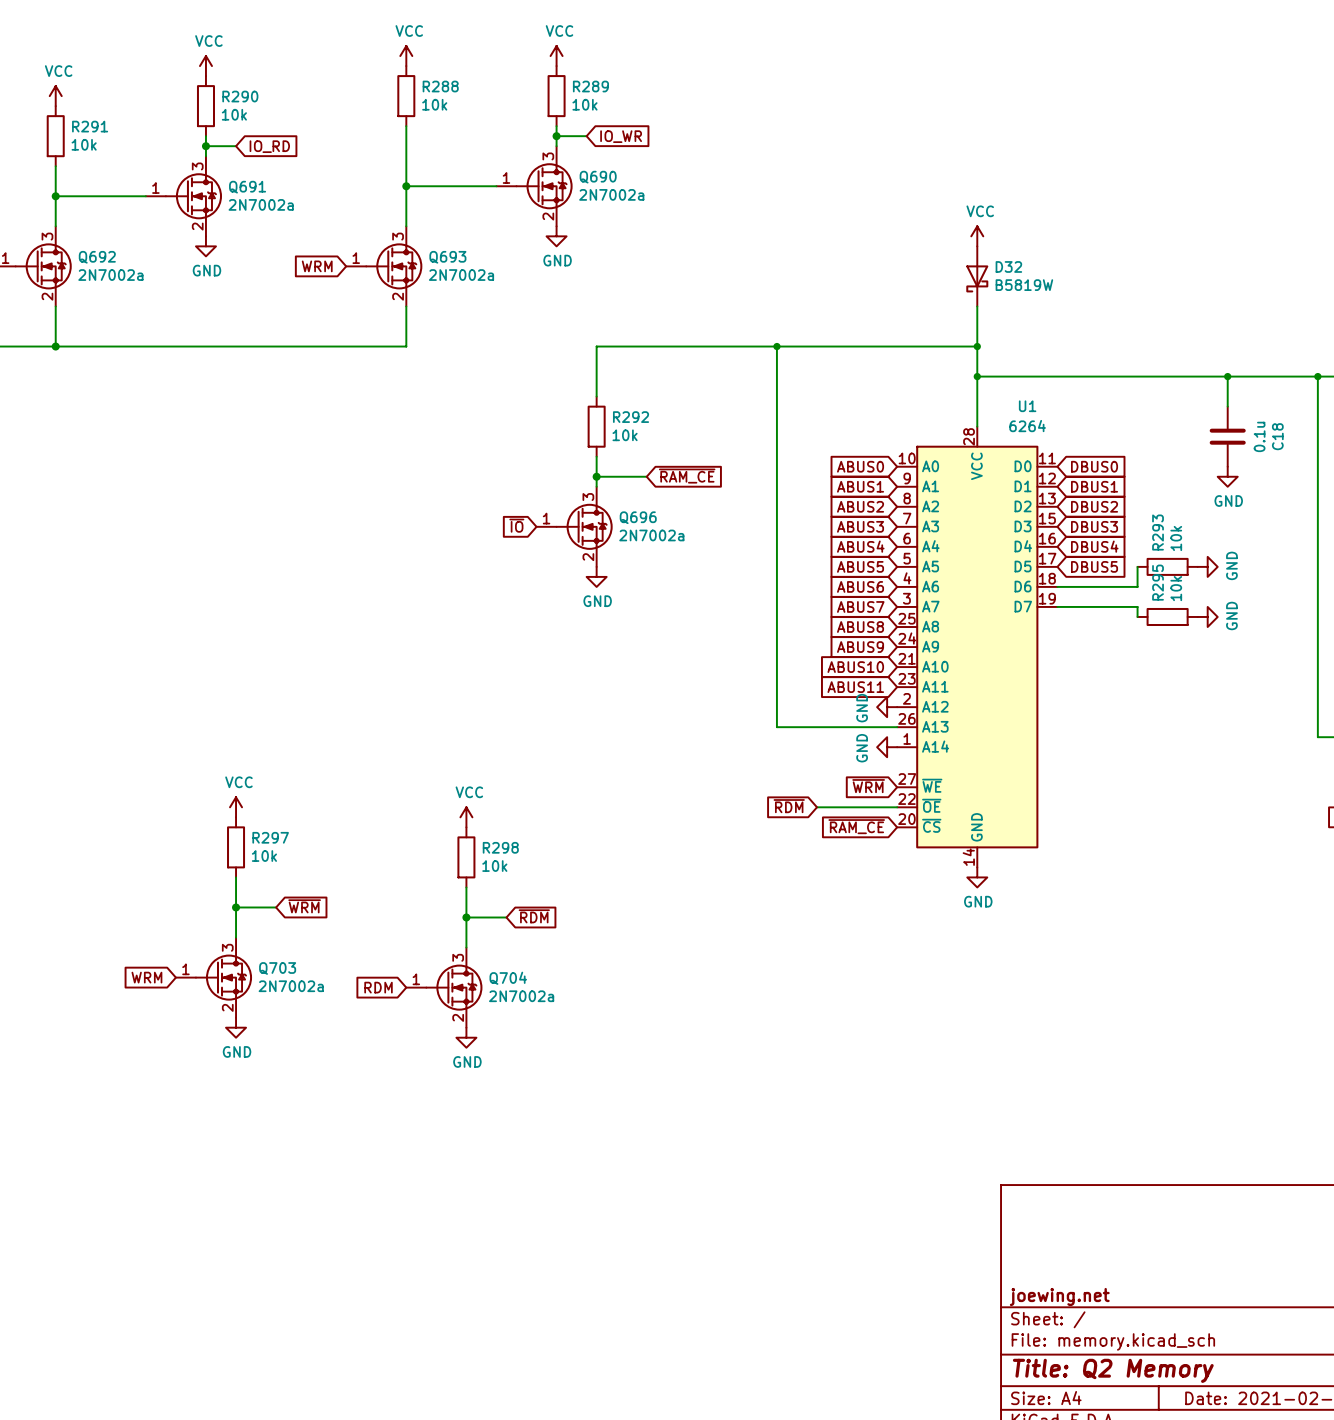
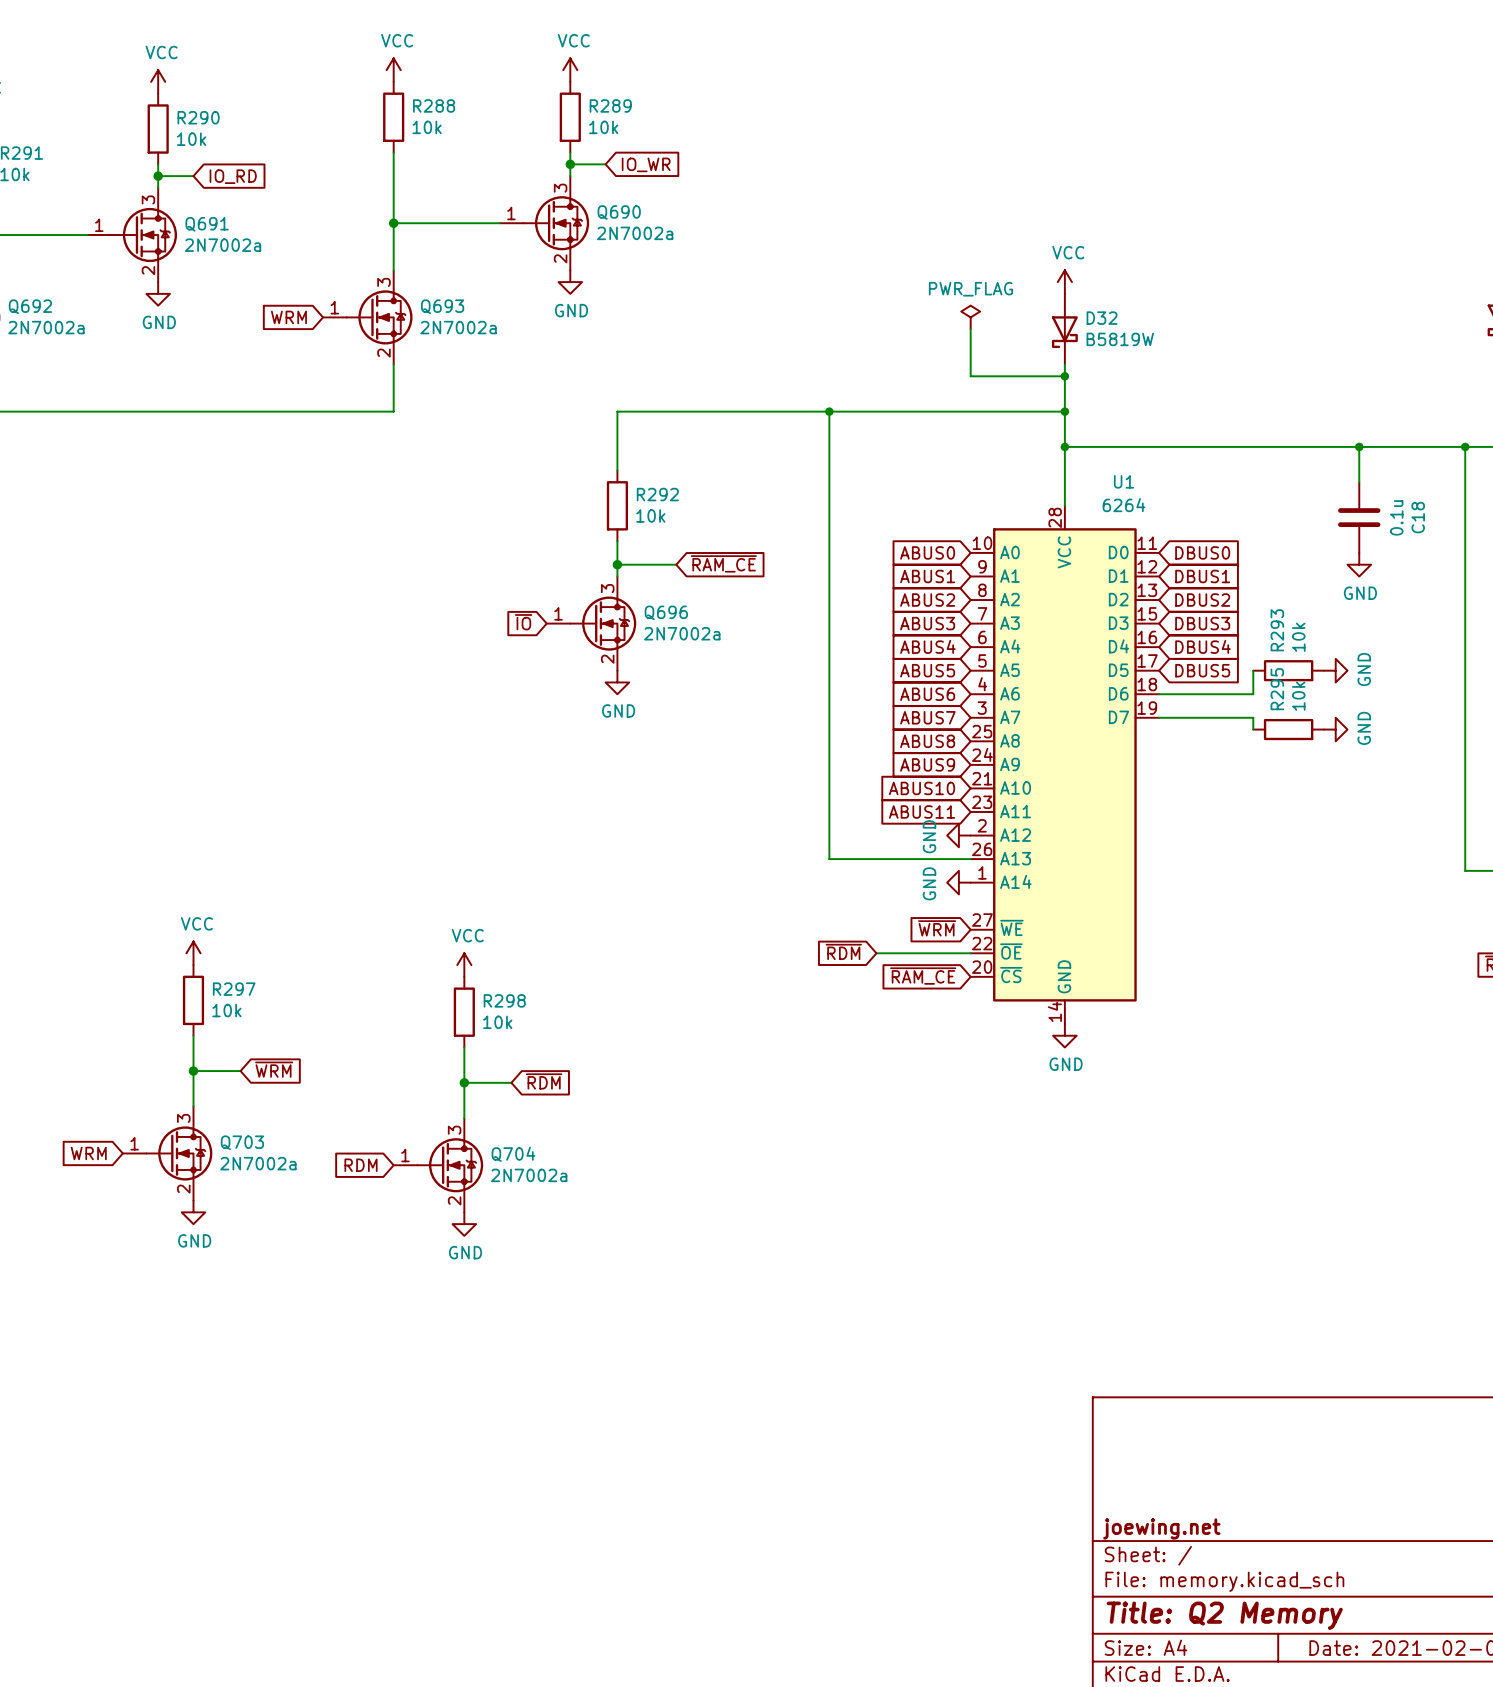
power symbol: none -> PWR_FLAG (970, 317)
wire: none -> (970, 329) (970, 376) (1064, 376)
junction: none -> (1064, 376)

